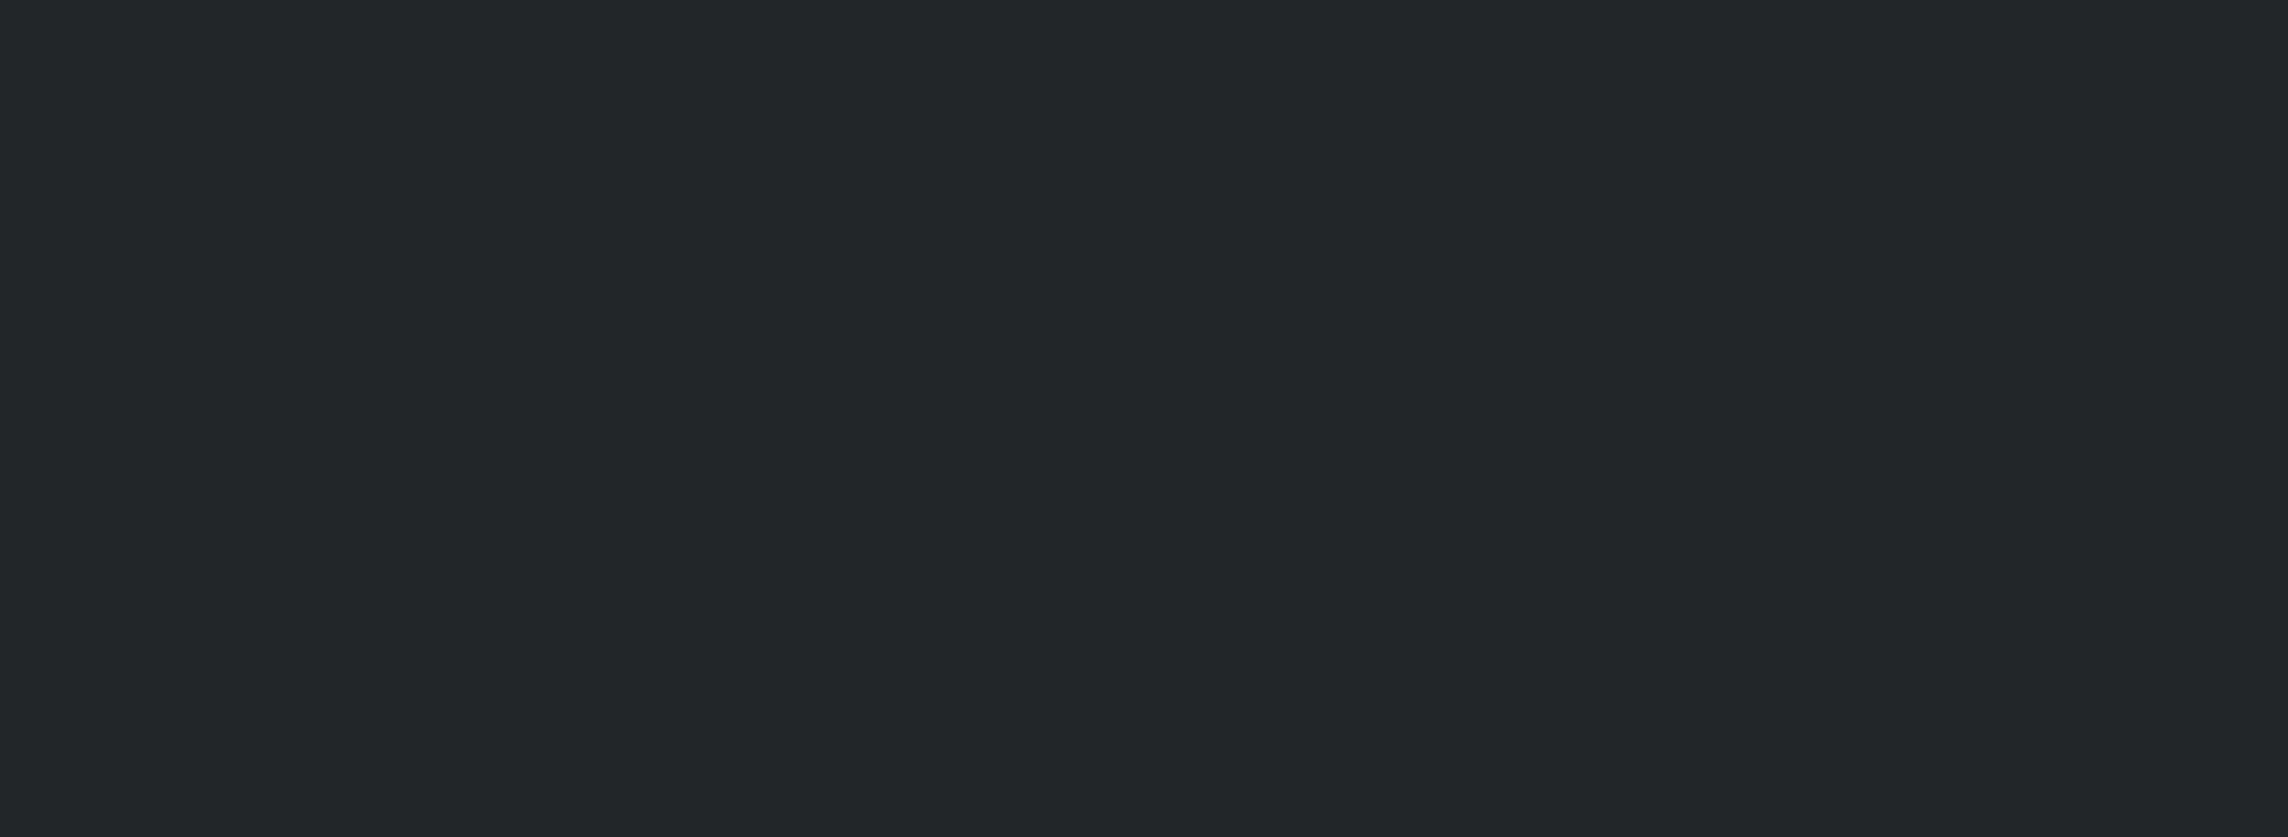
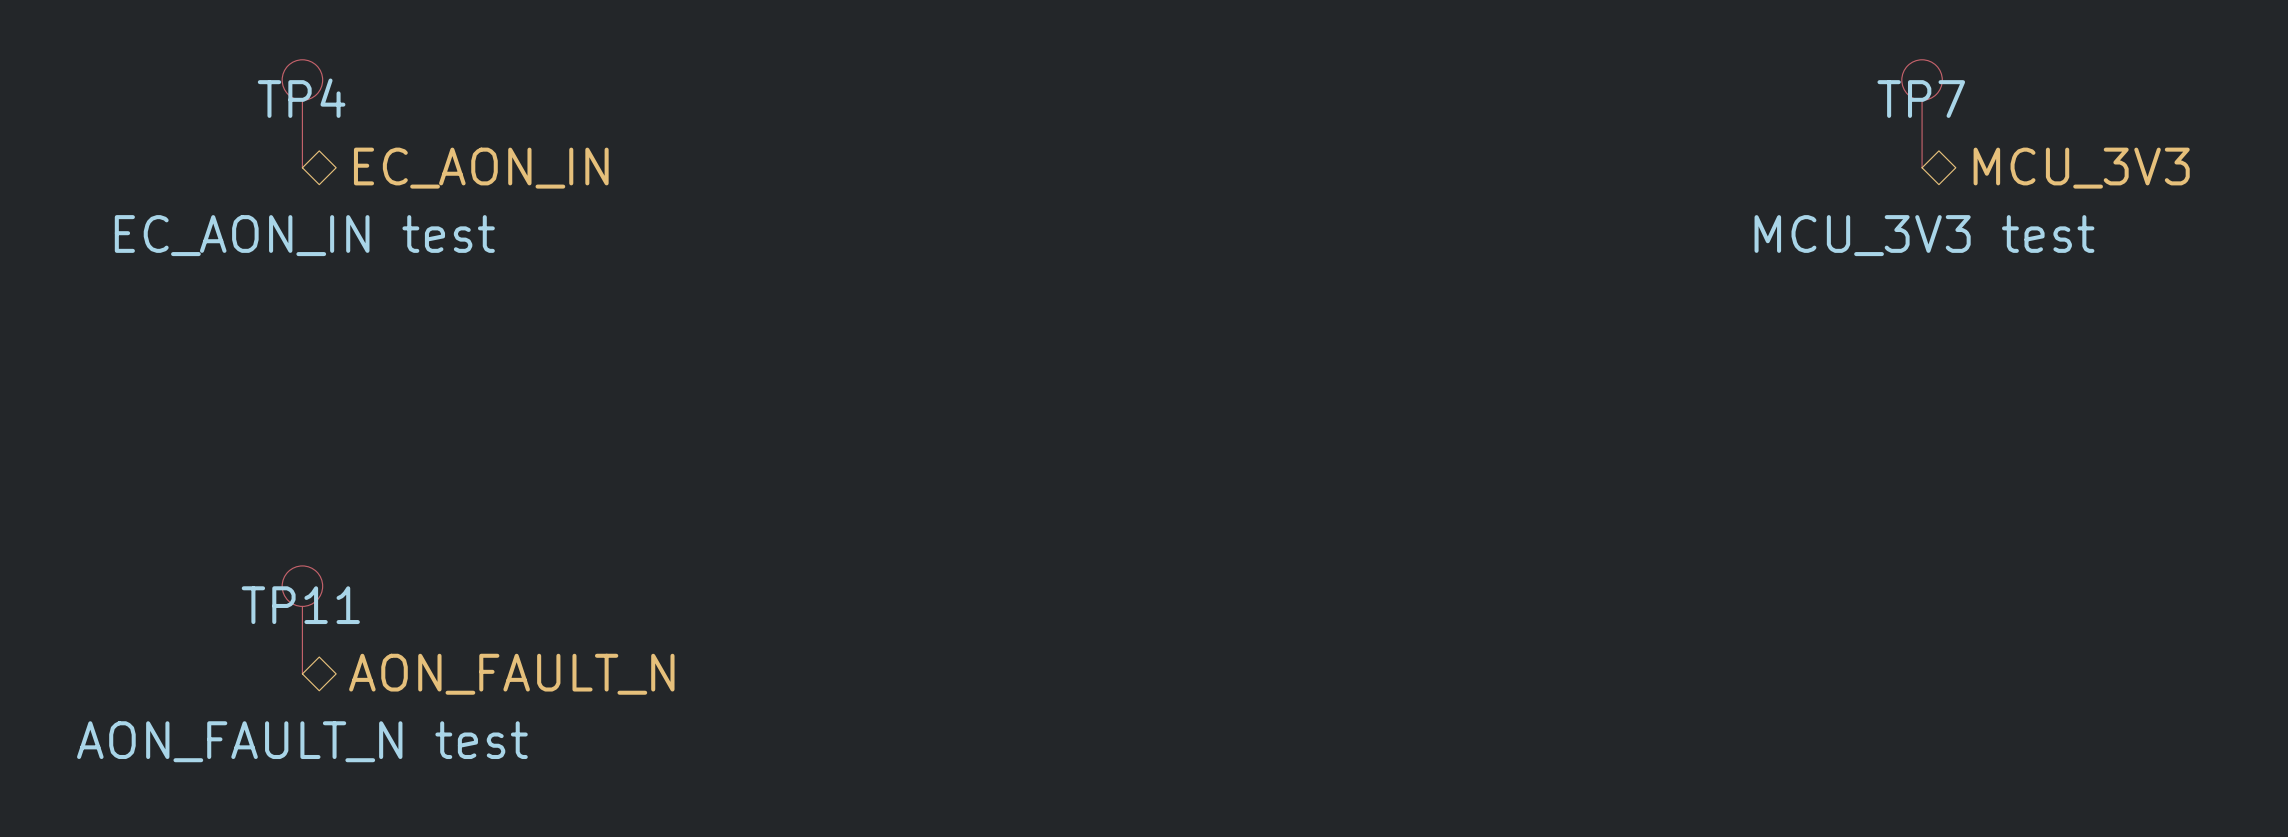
TP4: none -> EC_AON_IN test (302, 113)
TP7: none -> MCU_3V3 test (1922, 113)
hierarchical label: none -> EC_AON_IN (481, 168)
hierarchical label: none -> MCU_3V3 (2081, 168)
TP11: none -> AON_FAULT_N test (302, 619)
hierarchical label: none -> AON_FAULT_N (511, 674)

